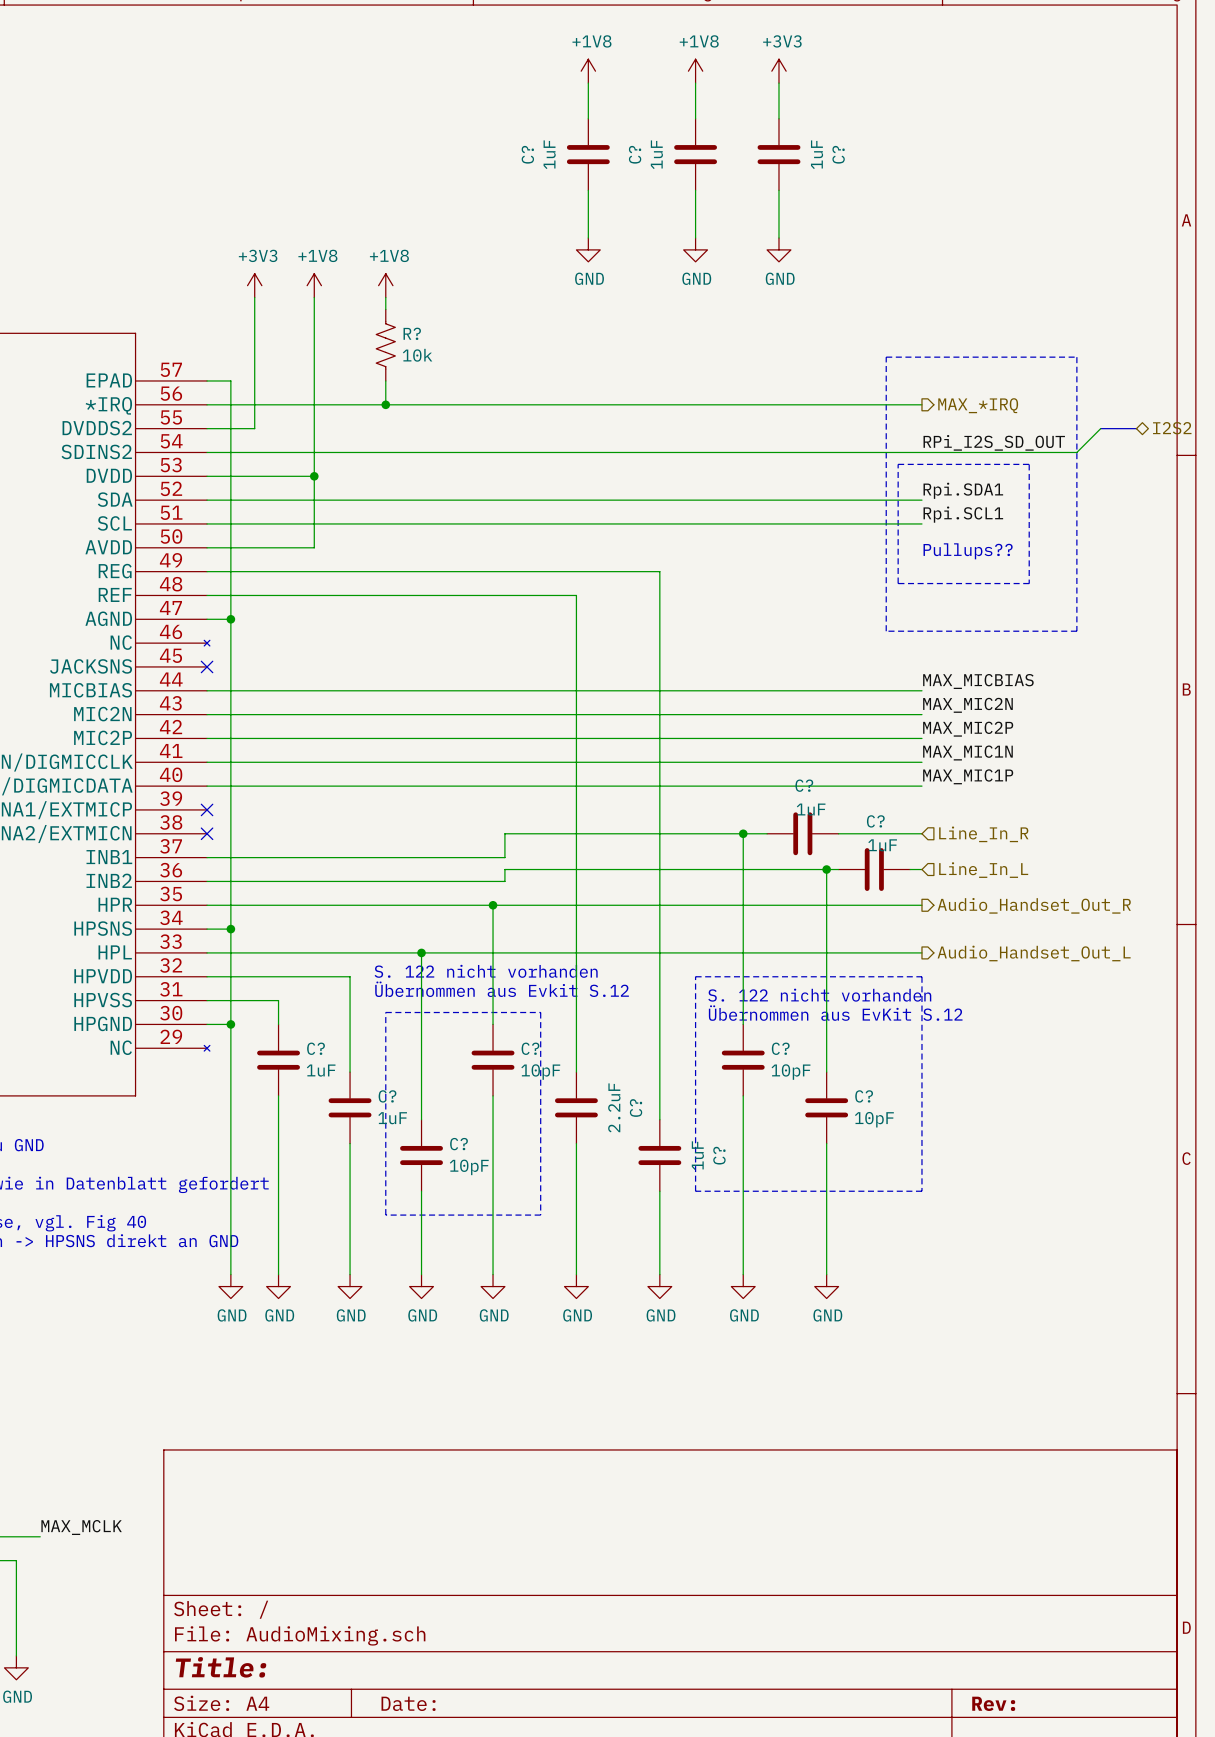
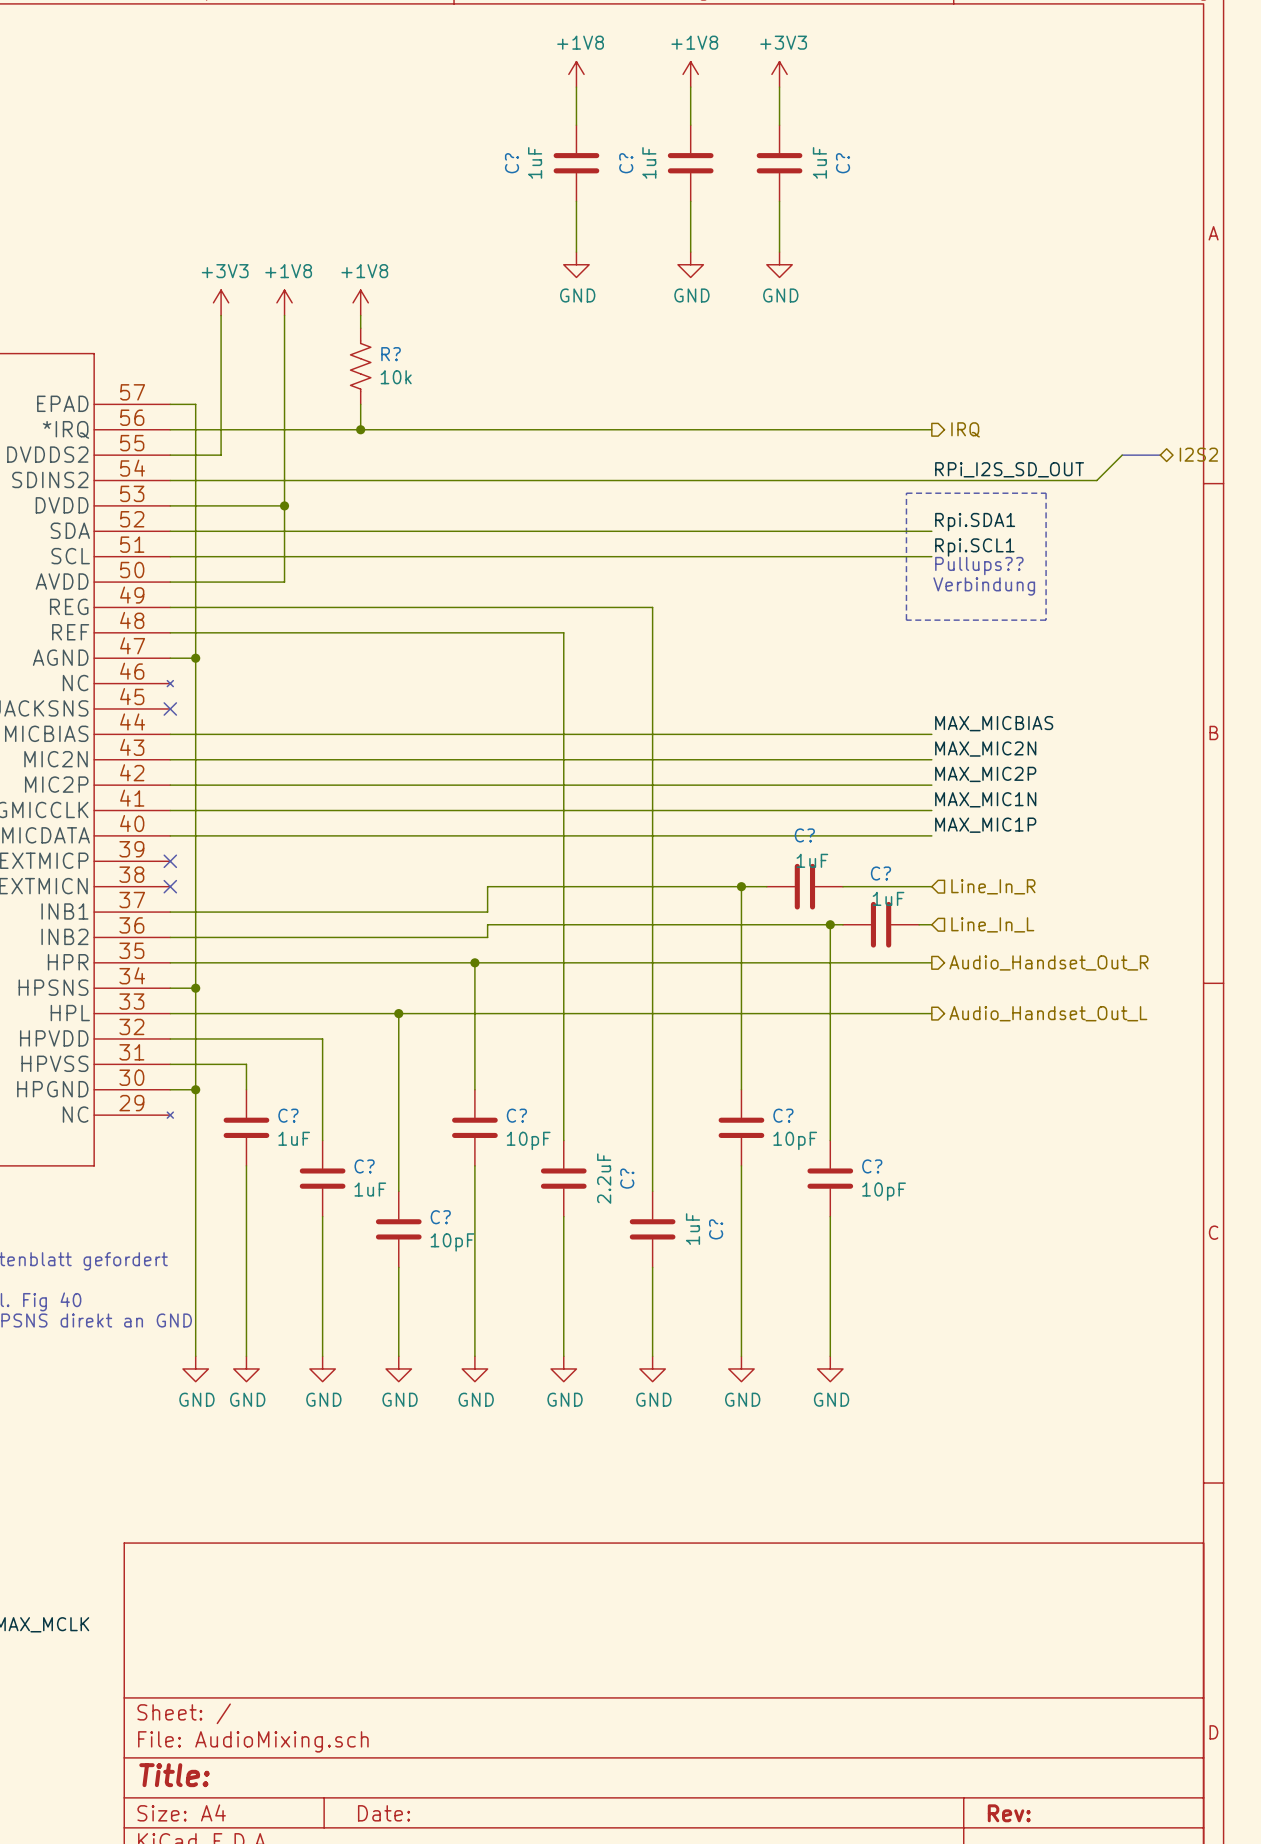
line: (886, 357) (1076, 357) (1076, 631) (886, 631) (886, 357) -> none
hierarchical label: MAX_*IRQ (978, 405) -> IRQ (965, 429)
text: none -> Pullups?? (979, 566)
text: Pullups?? (968, 551) -> Verbindung (984, 586)
text: S. 122 nicht vorhanden (486, 971) -> none
line: (695, 976) (921, 976) (921, 1191) (695, 1191) (695, 976) -> none
text: Übernommen aus Evkit S.12 (502, 989) -> none
text: S. 122 nicht vorhanden (819, 995) -> none
line: (385, 1012) (540, 1012) (540, 1215) (385, 1215) (385, 1012) -> none
text: Übernommen aus EvKit S.12 (835, 1013) -> none

